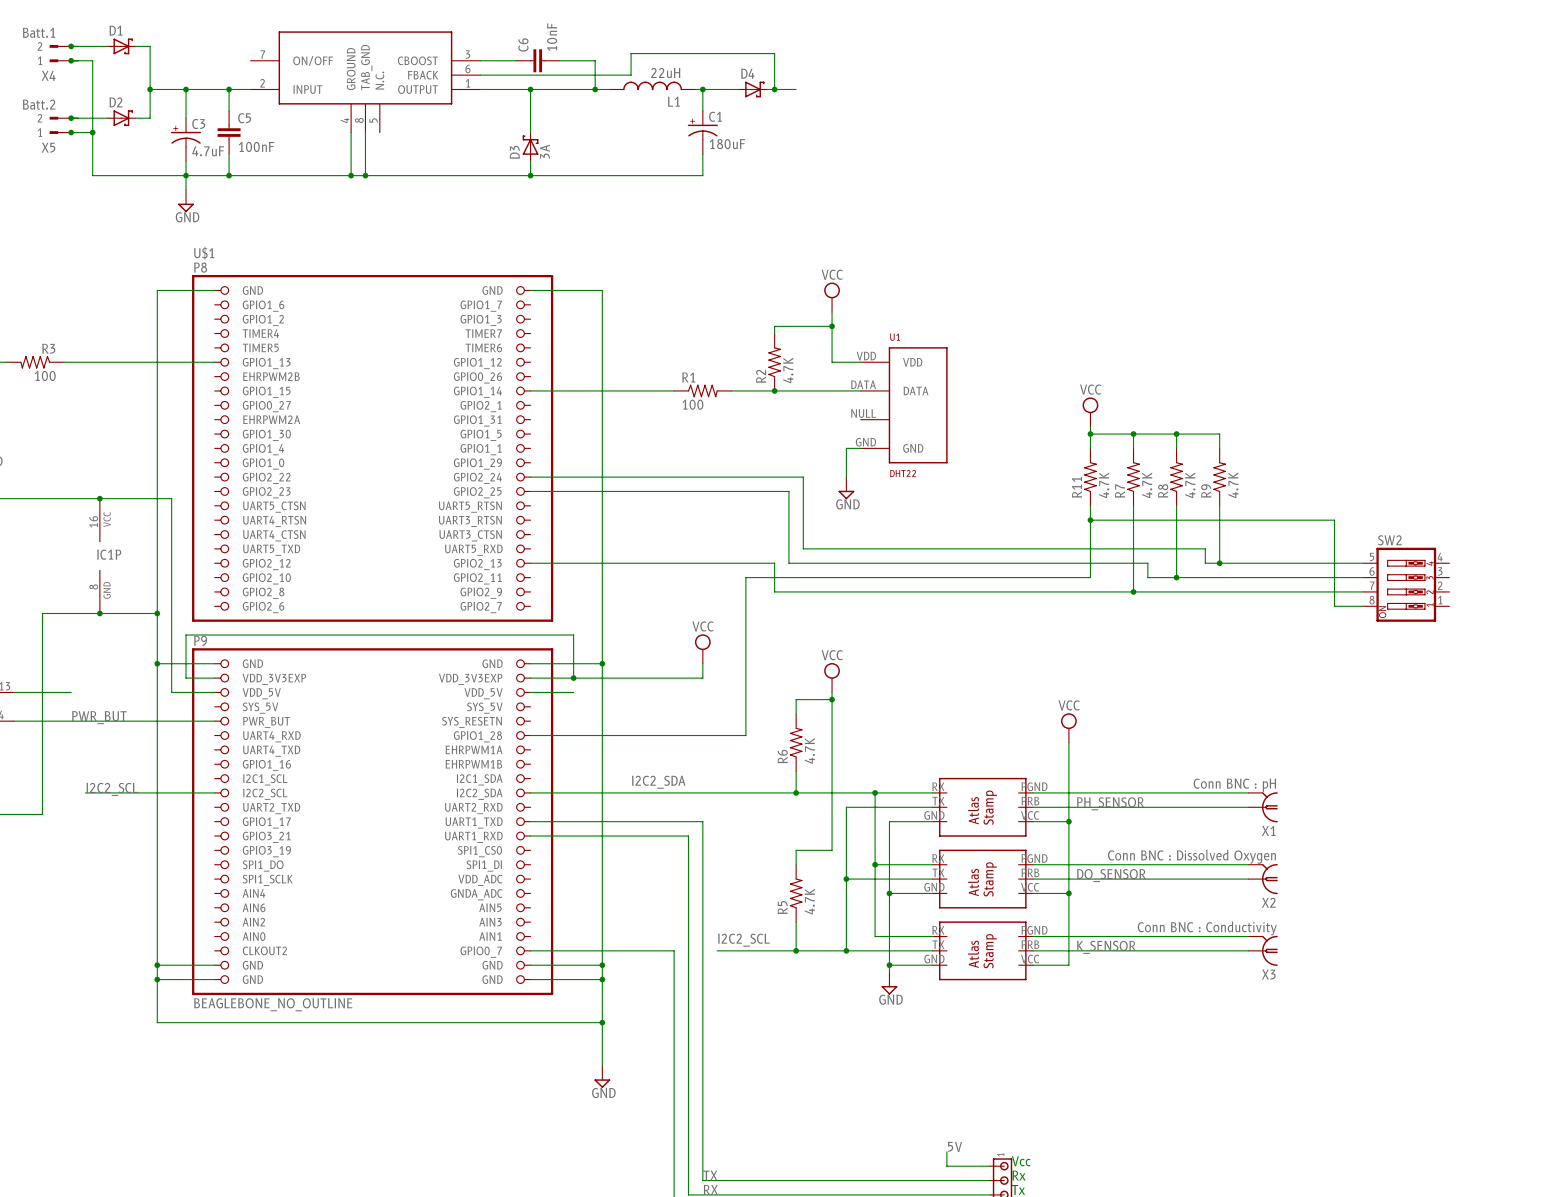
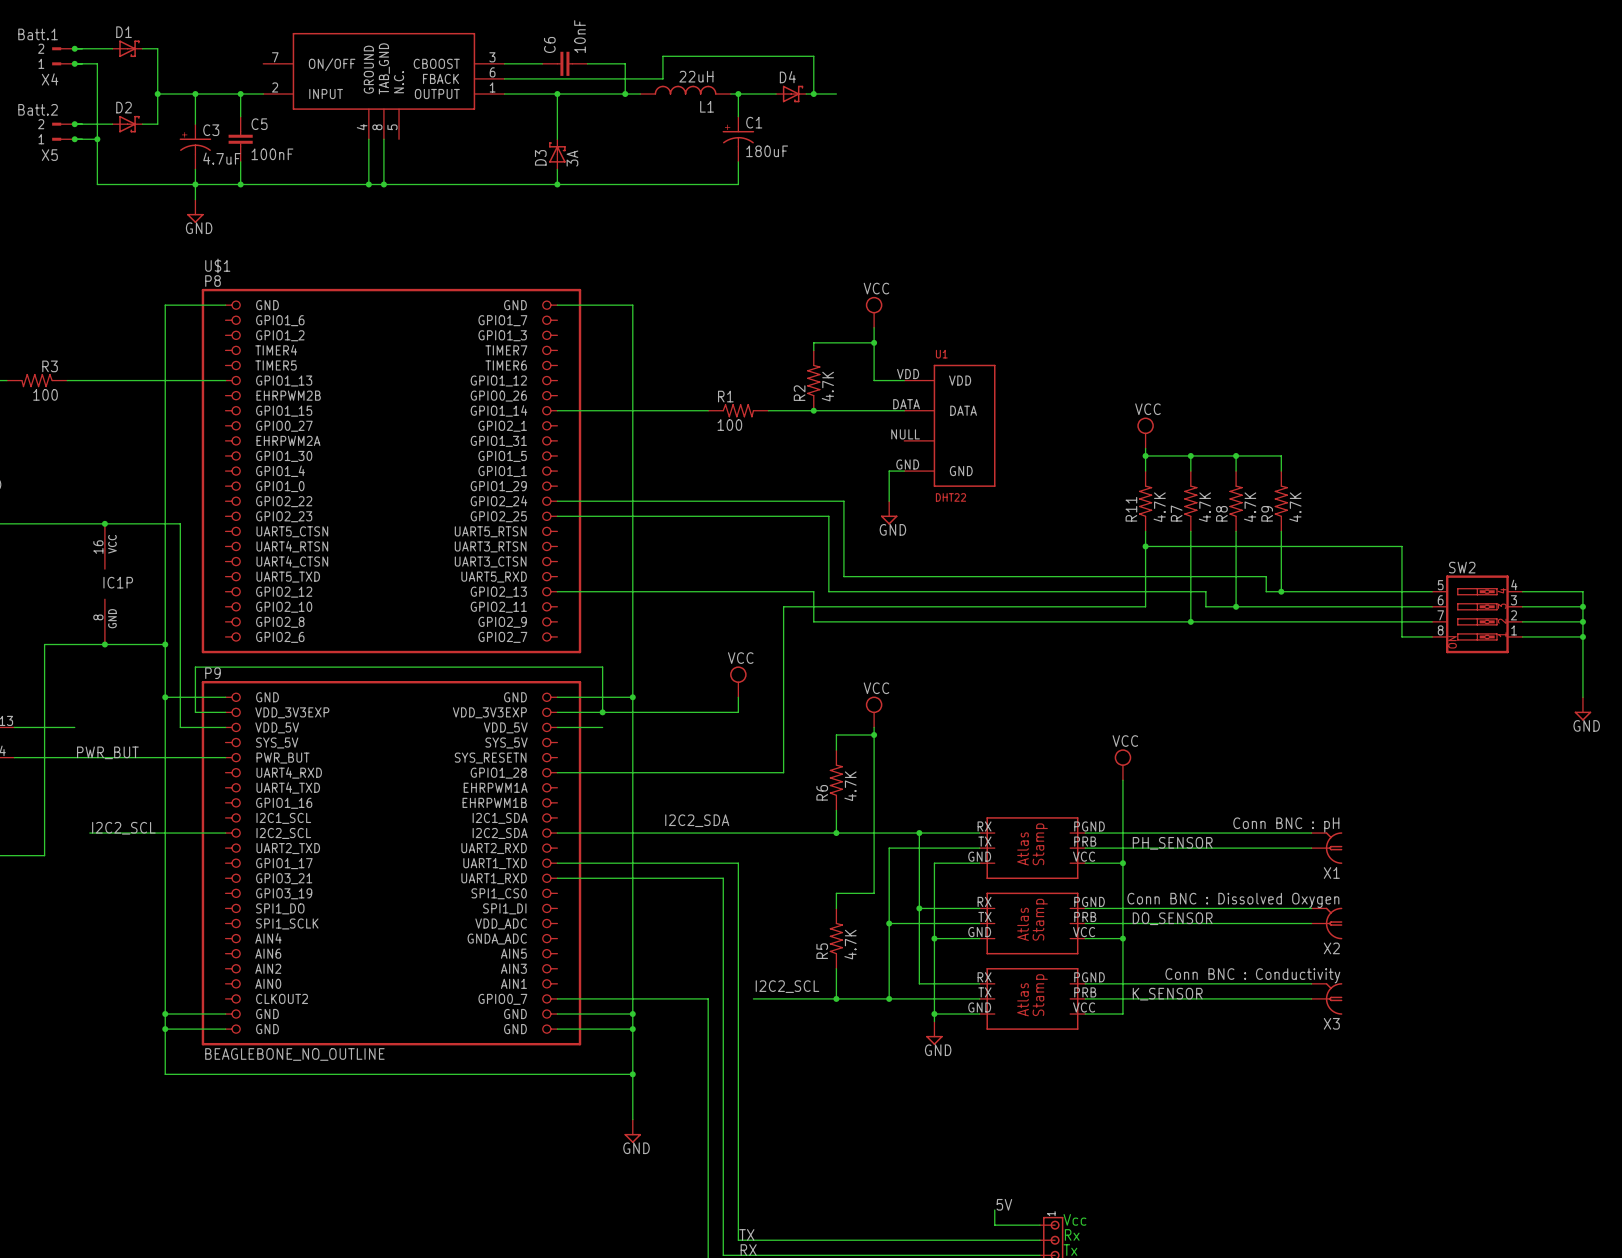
wire: none -> (1522, 591) (1582, 591) (1582, 697)
wire: none -> (1522, 606) (1582, 606)
junction: none -> (1582, 606)
wire: none -> (1522, 621) (1582, 621)
junction: none -> (1582, 621)
wire: none -> (1522, 636) (1582, 636)
junction: none -> (1582, 636)
power symbol: none -> GND (1582, 708)

